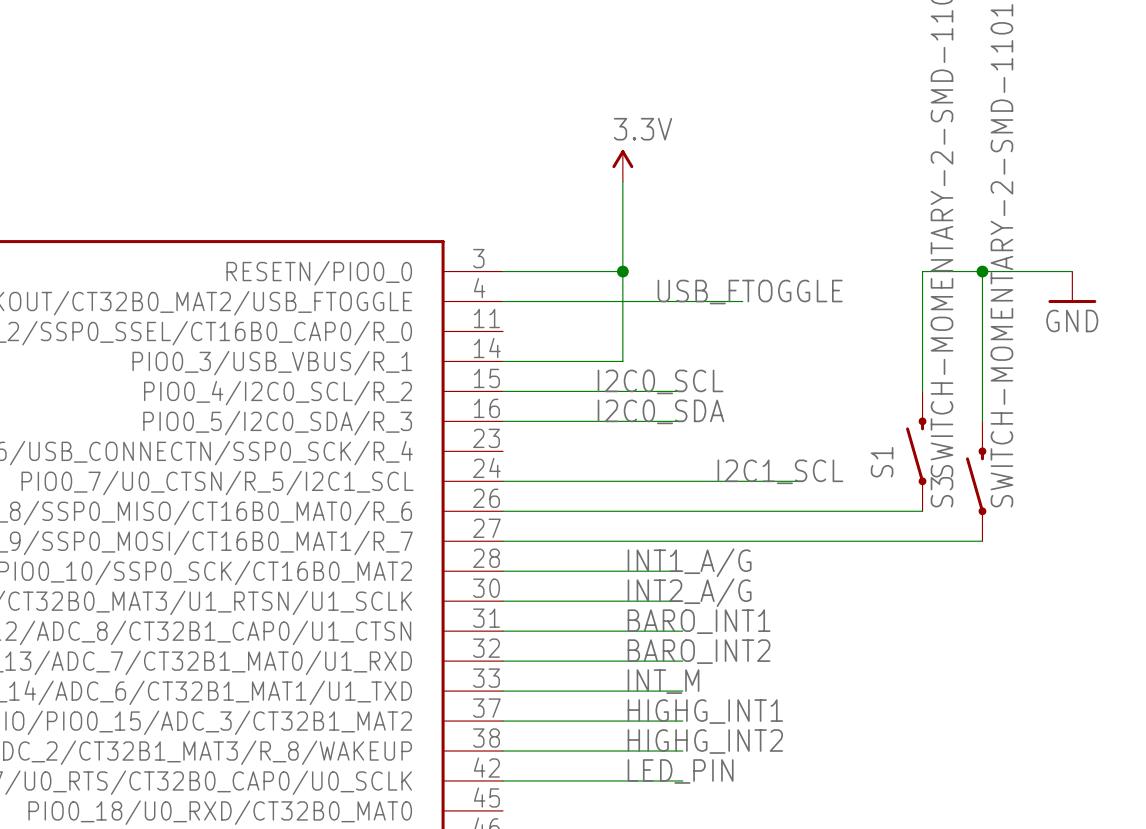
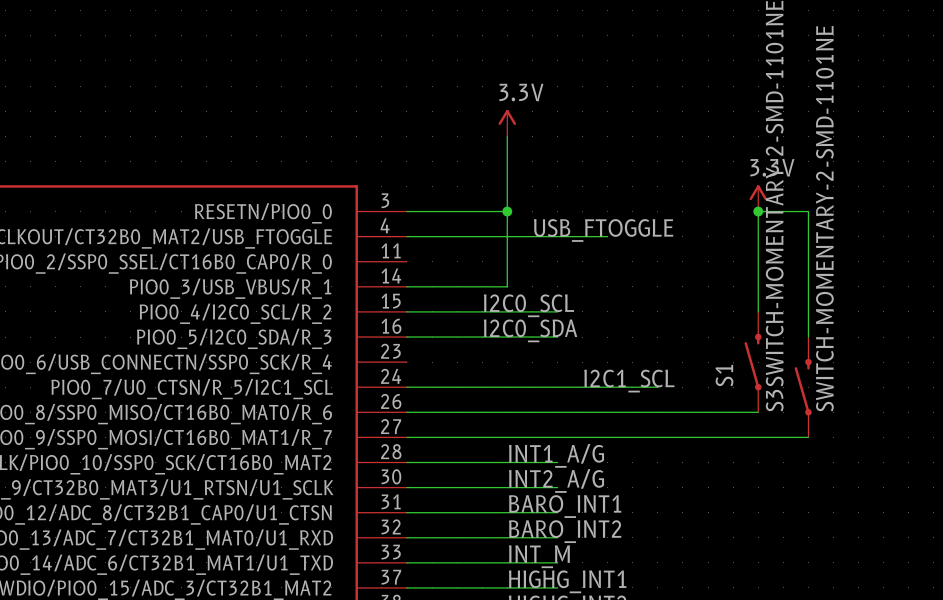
power symbol: none -> 3.3V (758, 198)
wire: (982, 271) (1072, 271) -> none
junction position: (982, 271) -> (758, 211)
power symbol: GND (1072, 287) -> none

